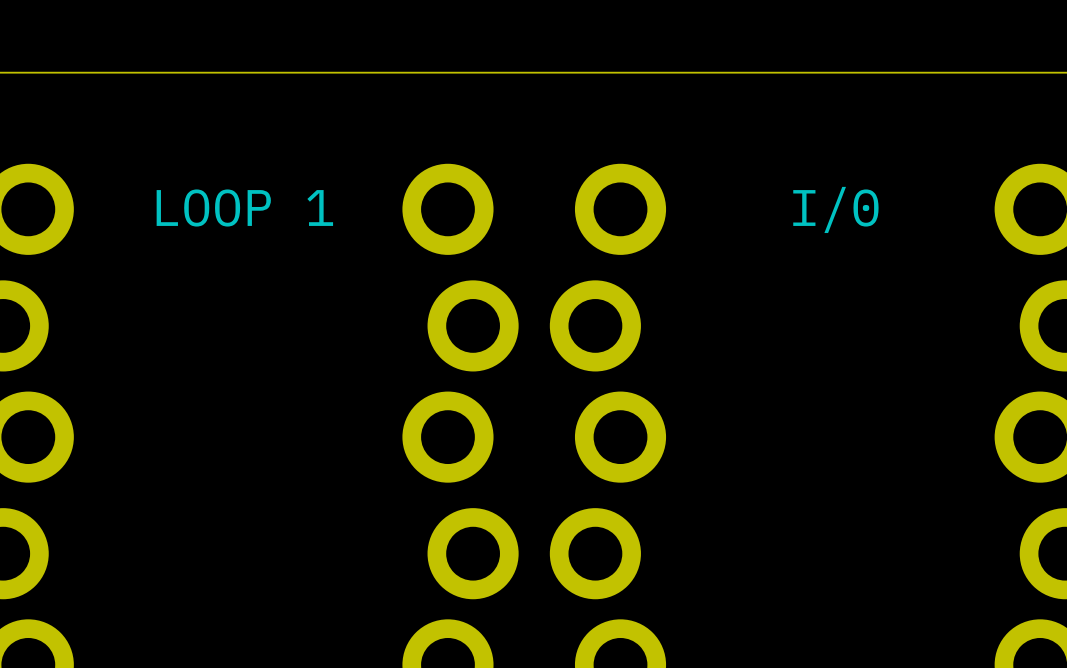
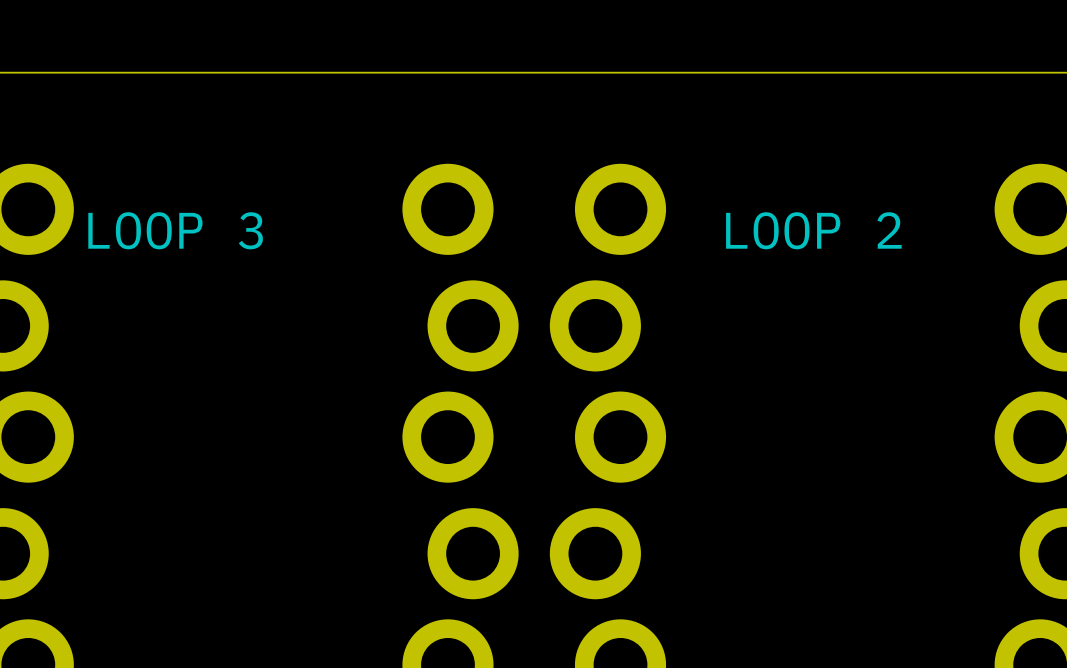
text: LOOP 1 (244, 208) -> LOOP 3 (175, 230)
text: I/0 (835, 209) -> LOOP 2 (813, 230)

